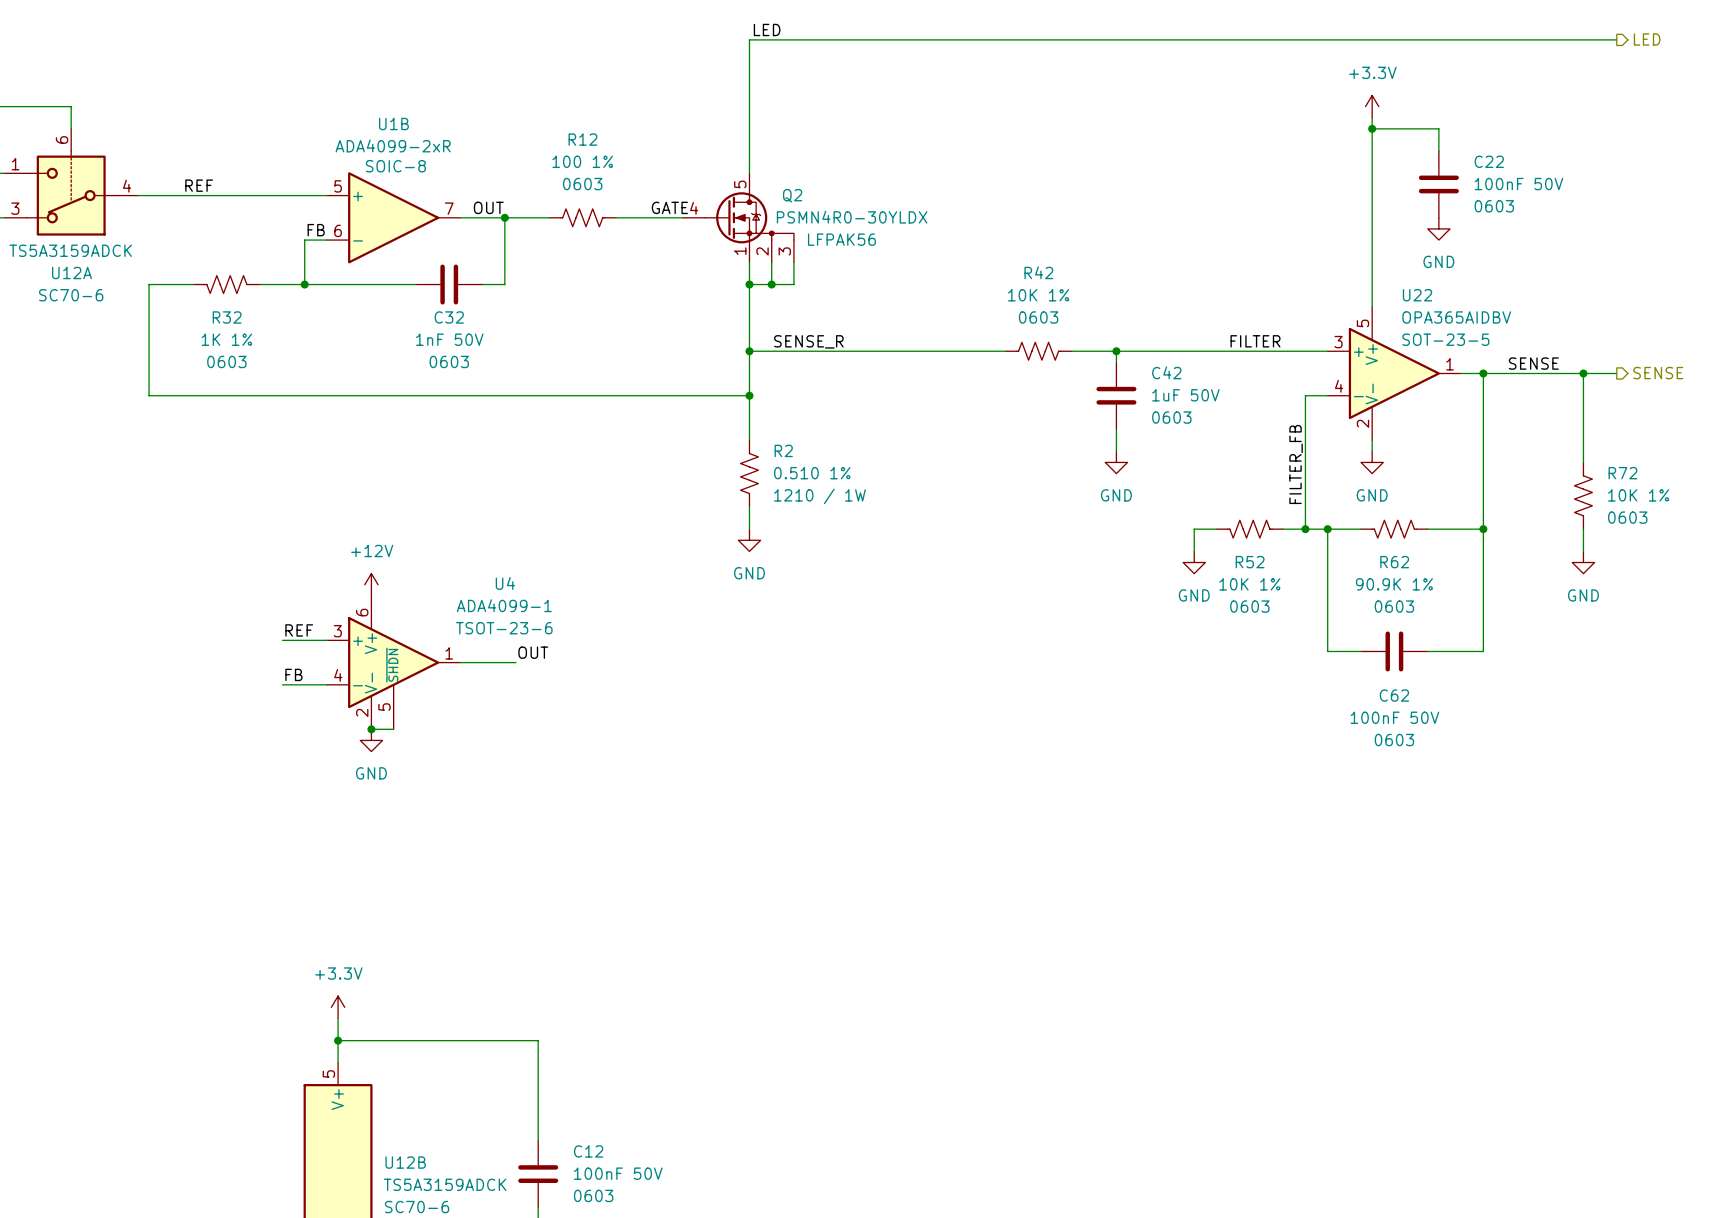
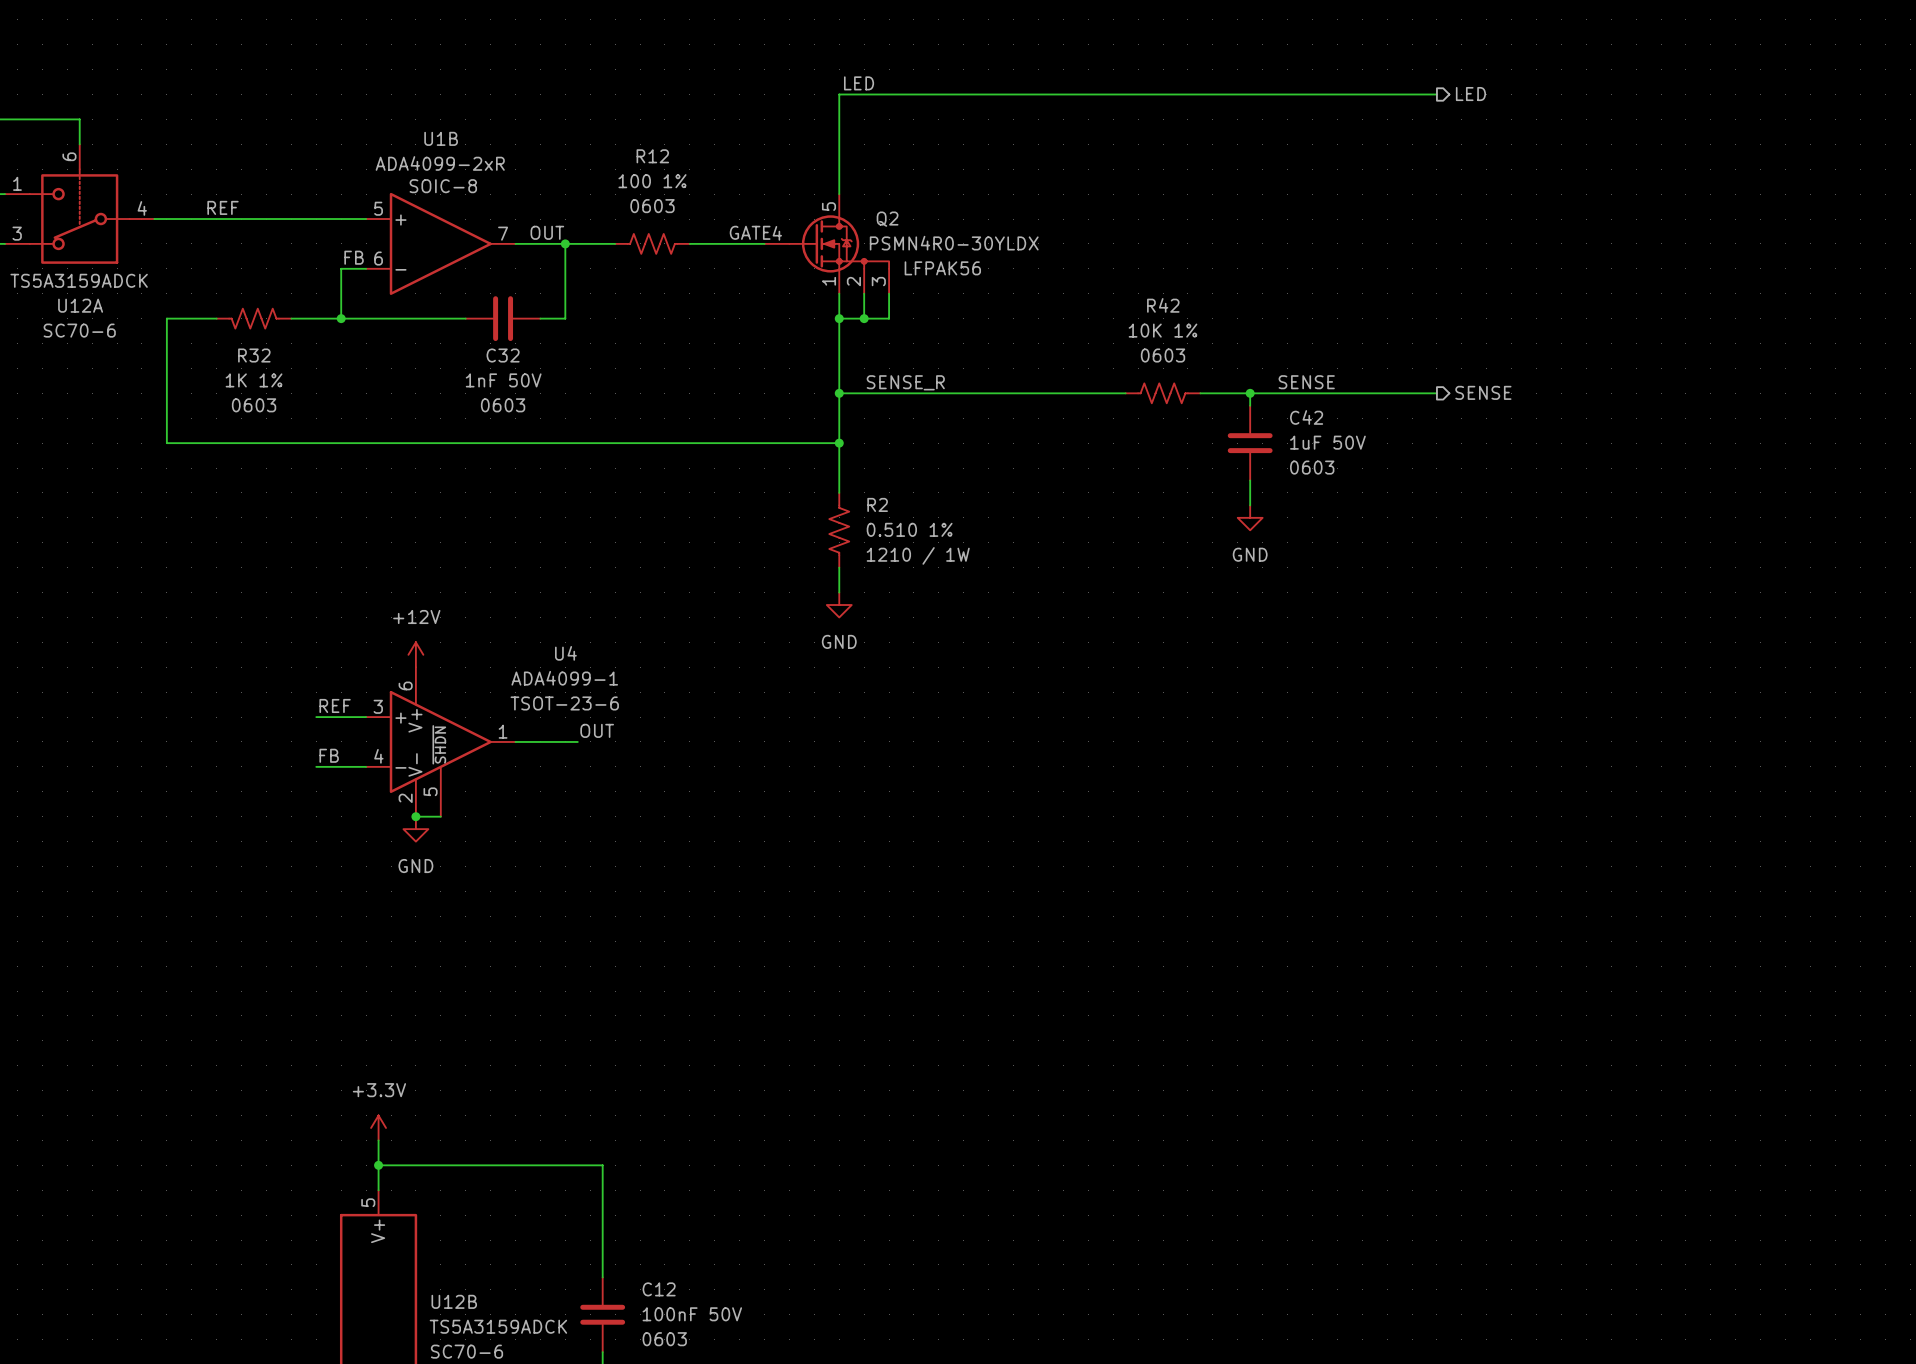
label position: LED (767, 29) -> LED (859, 83)
wire: (1616, 39) (749, 39) (749, 84) -> (1436, 94) (839, 94)
hierarchical label: LED (1647, 39) -> none
hierarchical label: none -> LED (1470, 94)
power symbol: +3.3V (1372, 106) -> none
wire: (1372, 117) (1372, 306) -> none
wire: (1372, 128) (1438, 128) (1438, 151) -> none
junction: (1372, 128) -> none
C22: 100nF 50V (1438, 184) -> none
power symbol: GND (1438, 228) -> none
label: none -> SENSE (1306, 382)
label: FILTER (1255, 341) -> none
hierarchical label: none -> SENSE (1483, 392)
wire: (1283, 351) (1327, 351) -> none
label: SENSE (1533, 363) -> none
U22: OPA365AIDBV (1394, 373) -> none
wire: (1461, 373) (1616, 373) -> none
wire: (1483, 373) (1483, 651) (1427, 651) -> none
junction: (1483, 373) -> none
wire: (1583, 373) (1583, 462) -> none
junction: (1583, 373) -> none
hierarchical label: SENSE (1658, 373) -> none
wire: (1327, 395) (1305, 395) (1305, 529) -> none
wire: (1372, 440) (1372, 451) -> none
power symbol: GND (1372, 462) -> none
label: FILTER_FB (1296, 464) -> none
R72: 10K 1% (1583, 495) -> none
wire: (1216, 529) (1194, 529) (1194, 551) -> none
R52: 10K 1% (1249, 529) -> none
wire: (1283, 529) (1361, 529) -> none
junction: (1305, 529) -> none
wire: (1327, 529) (1327, 651) (1361, 651) -> none
junction: (1327, 529) -> none
R62: 90.9K 1% (1394, 529) -> none
wire: (1427, 529) (1483, 529) -> none
junction: (1483, 529) -> none
wire: (1583, 529) (1583, 551) -> none
power symbol: GND (1194, 562) -> none
power symbol: GND (1583, 562) -> none
C62: 100nF 50V (1394, 651) -> none

